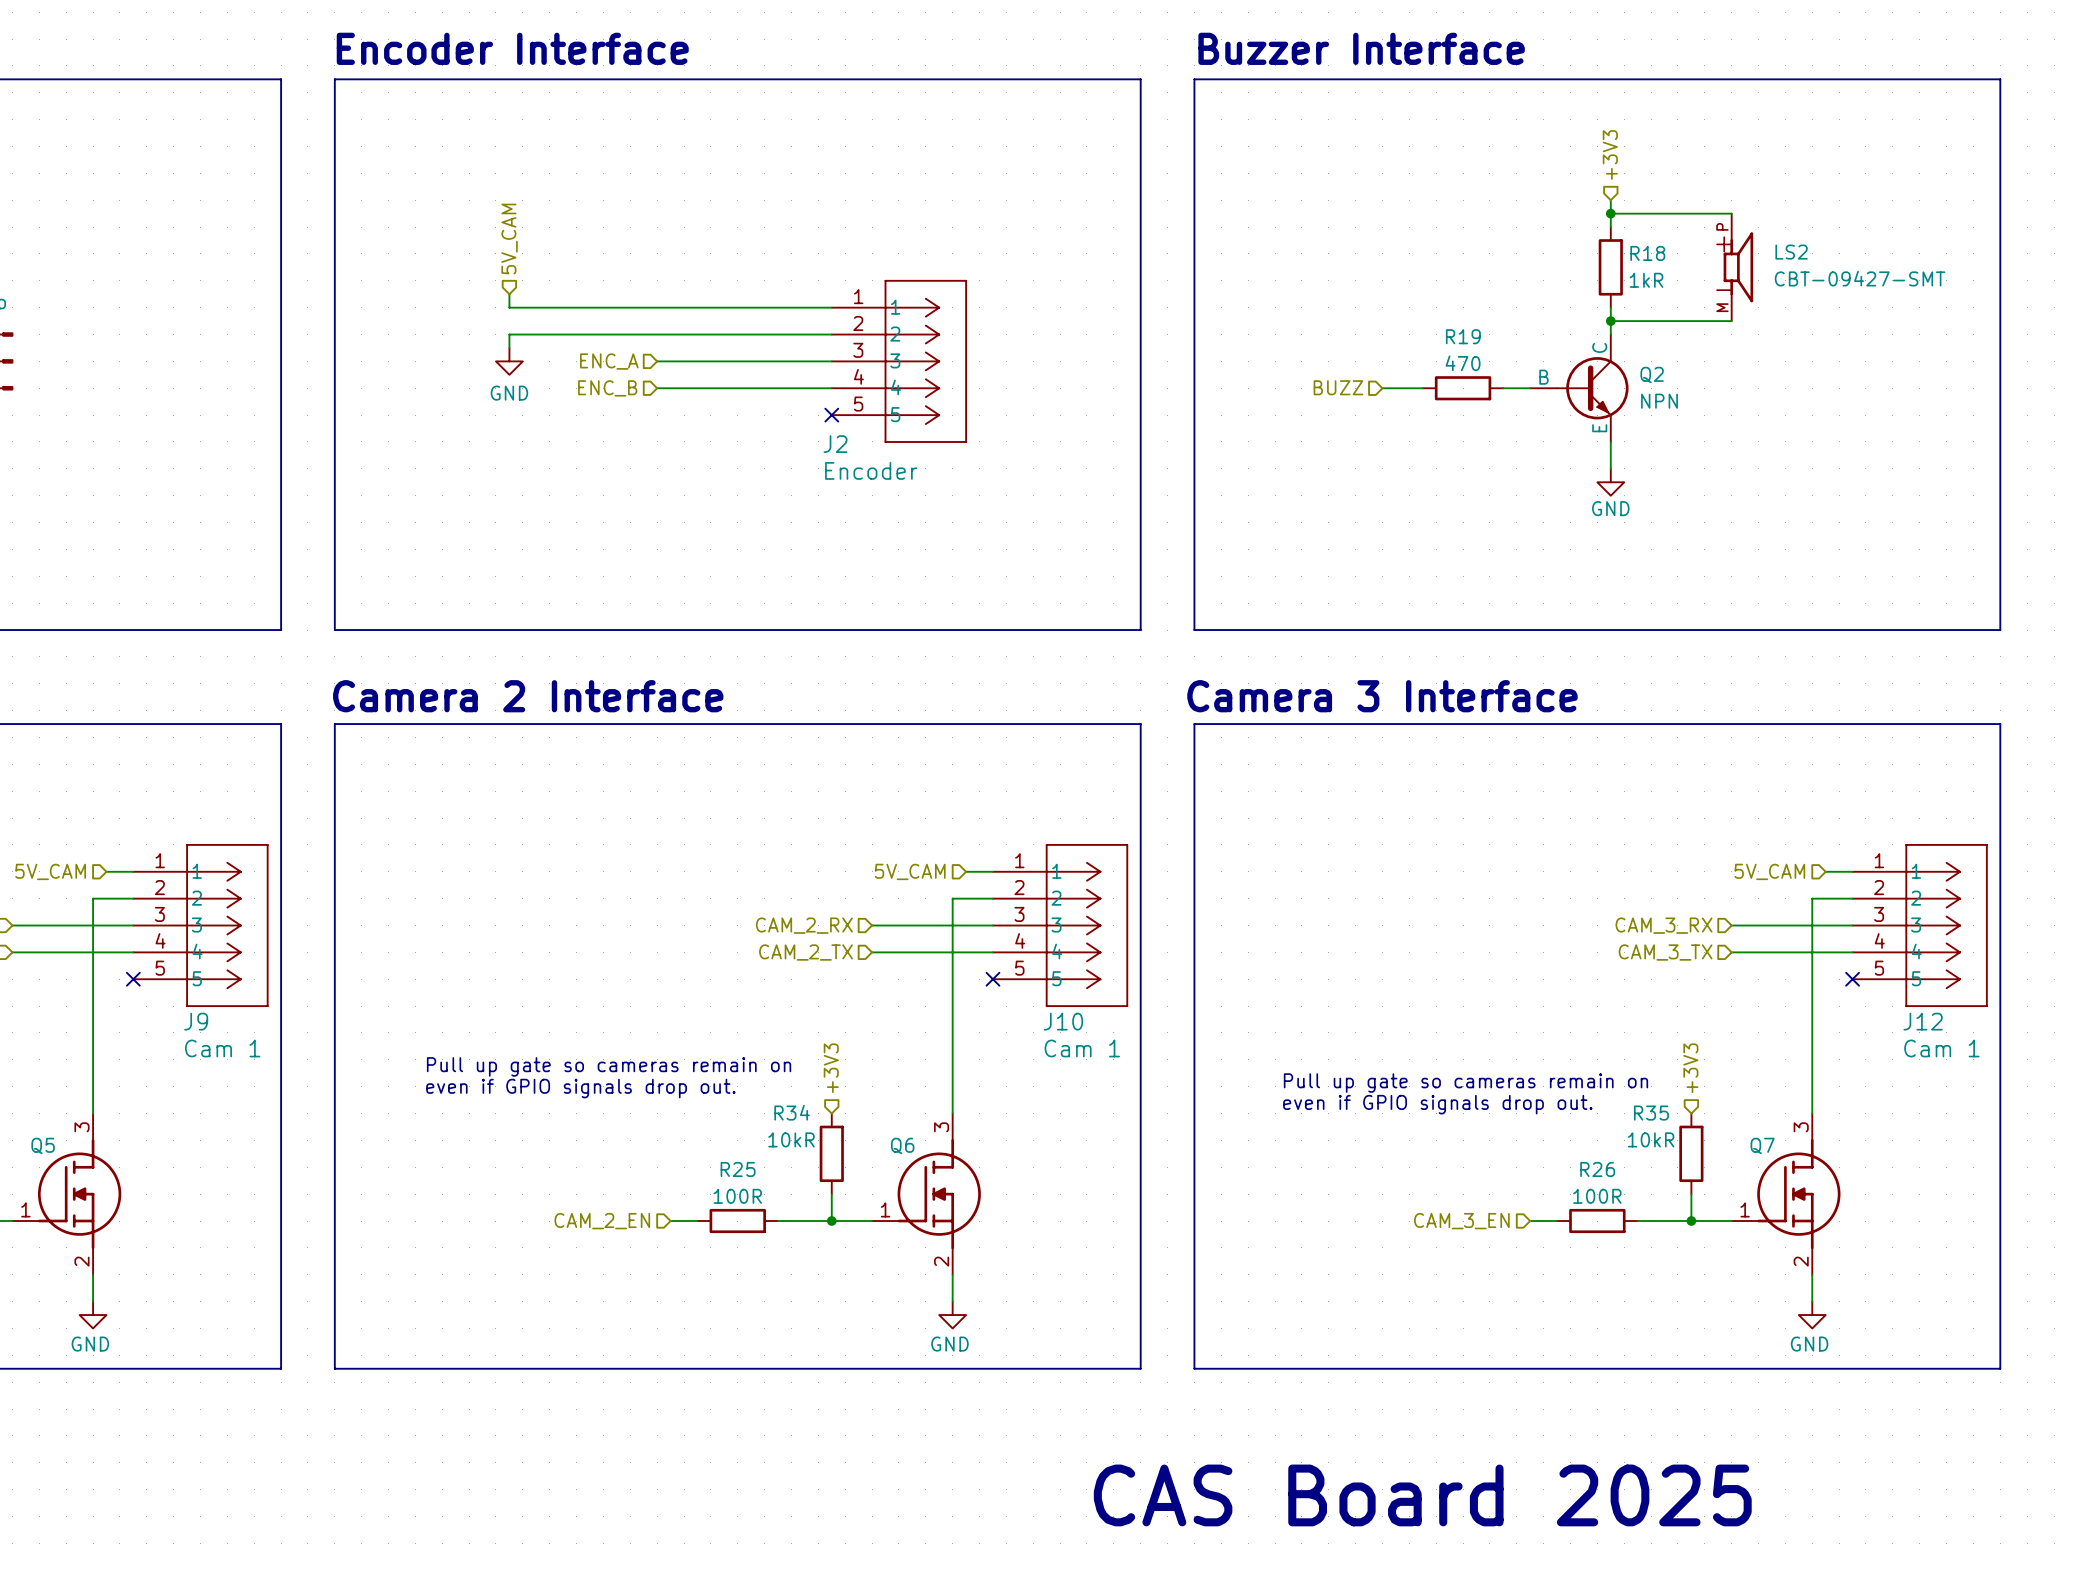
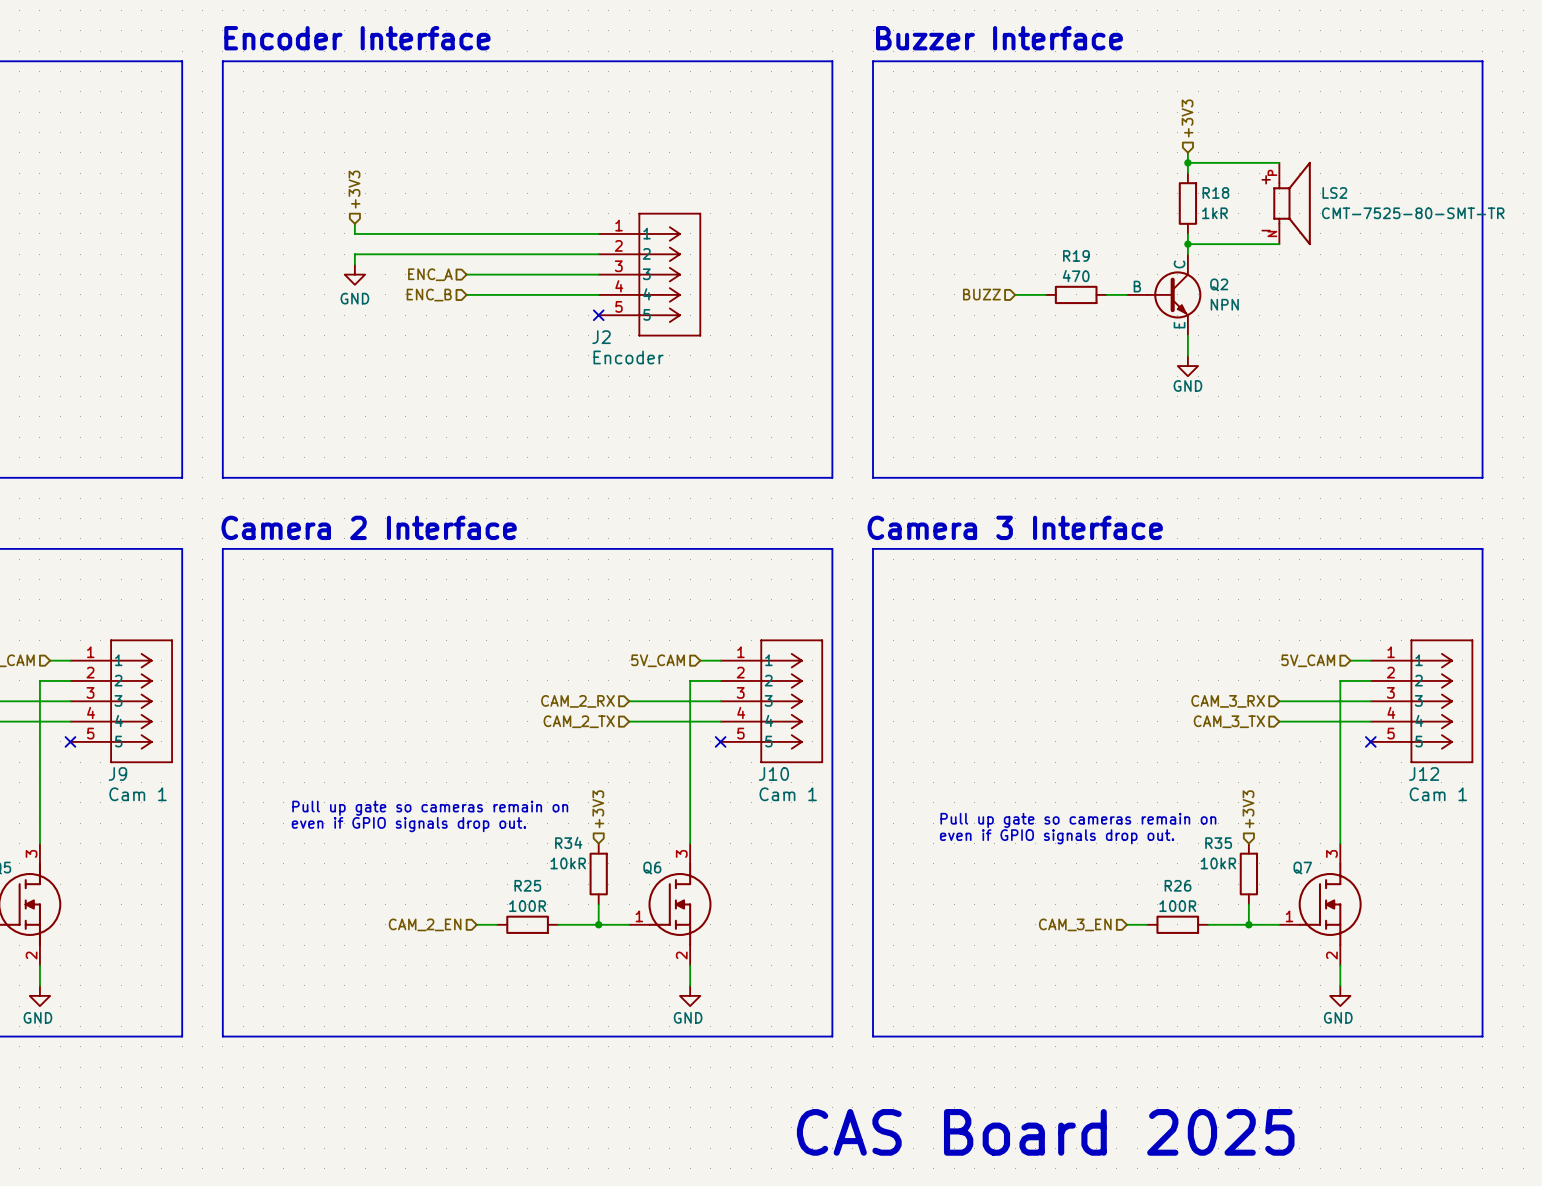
LS2 symbol: [1723, 213, 1754, 322] -> [1273, 161, 1311, 246]
hierarchical label: 5V_CAM (509, 239) -> +3V3 (354, 189)
LS2 value: CBT-09427-SMT (1860, 278) -> CMT-7525-80-SMT-TR (1413, 213)

